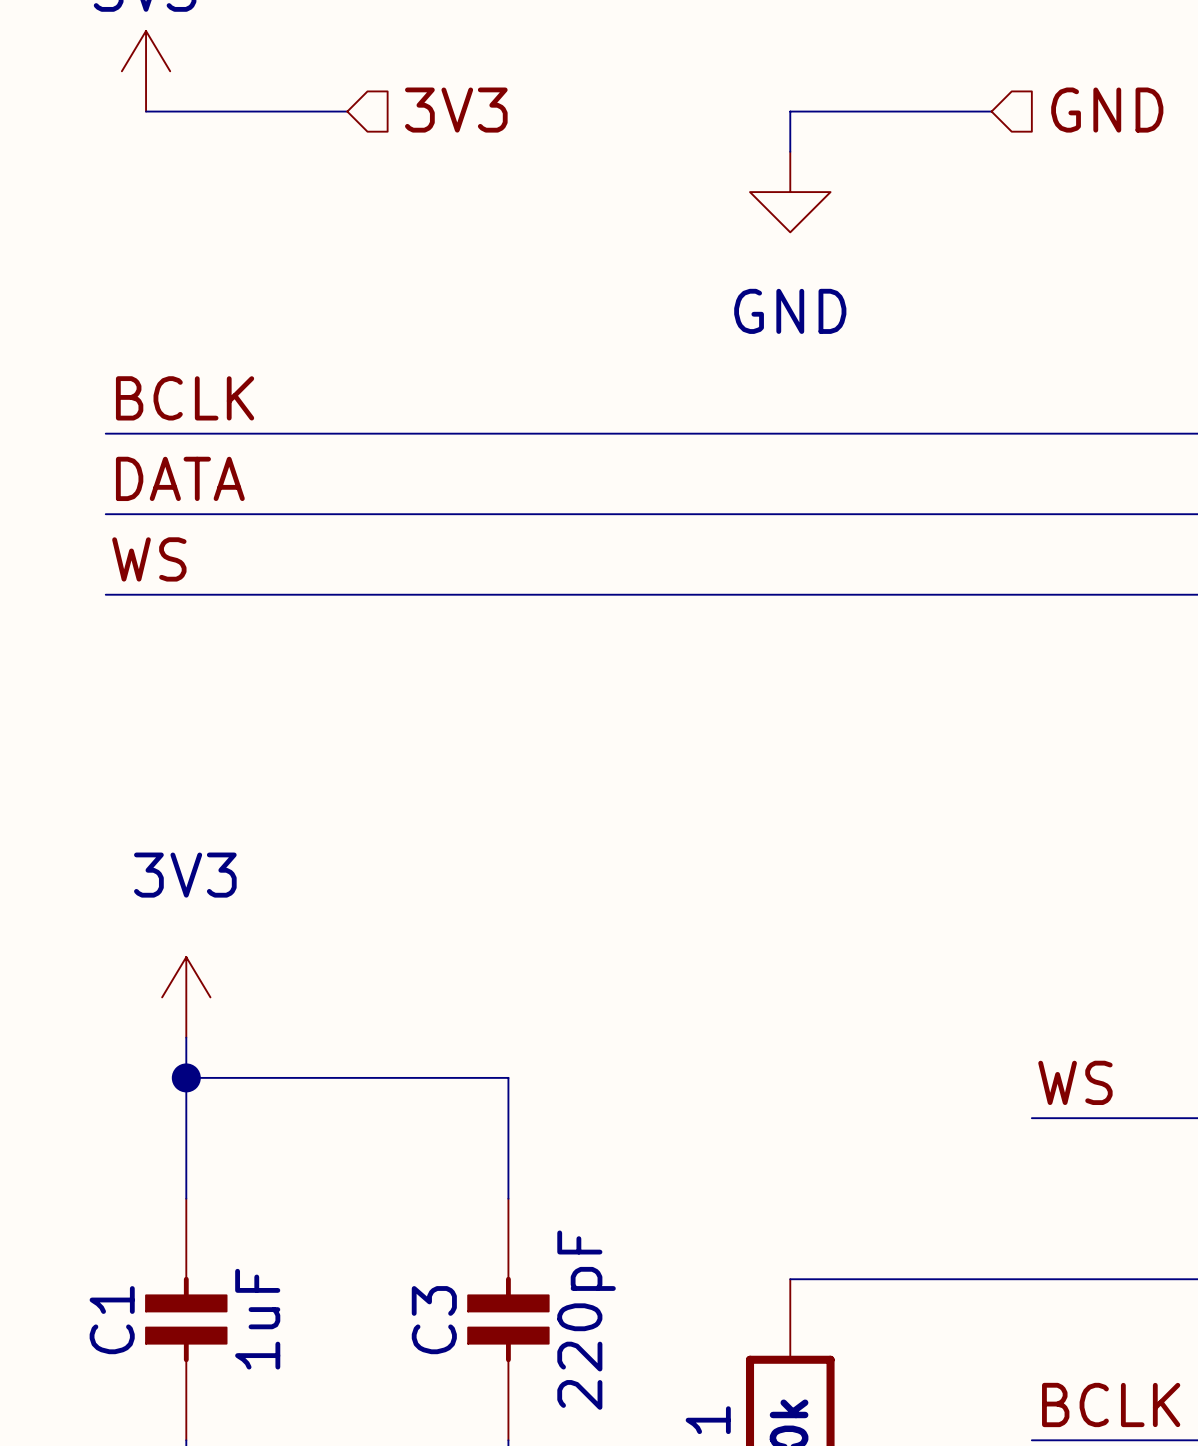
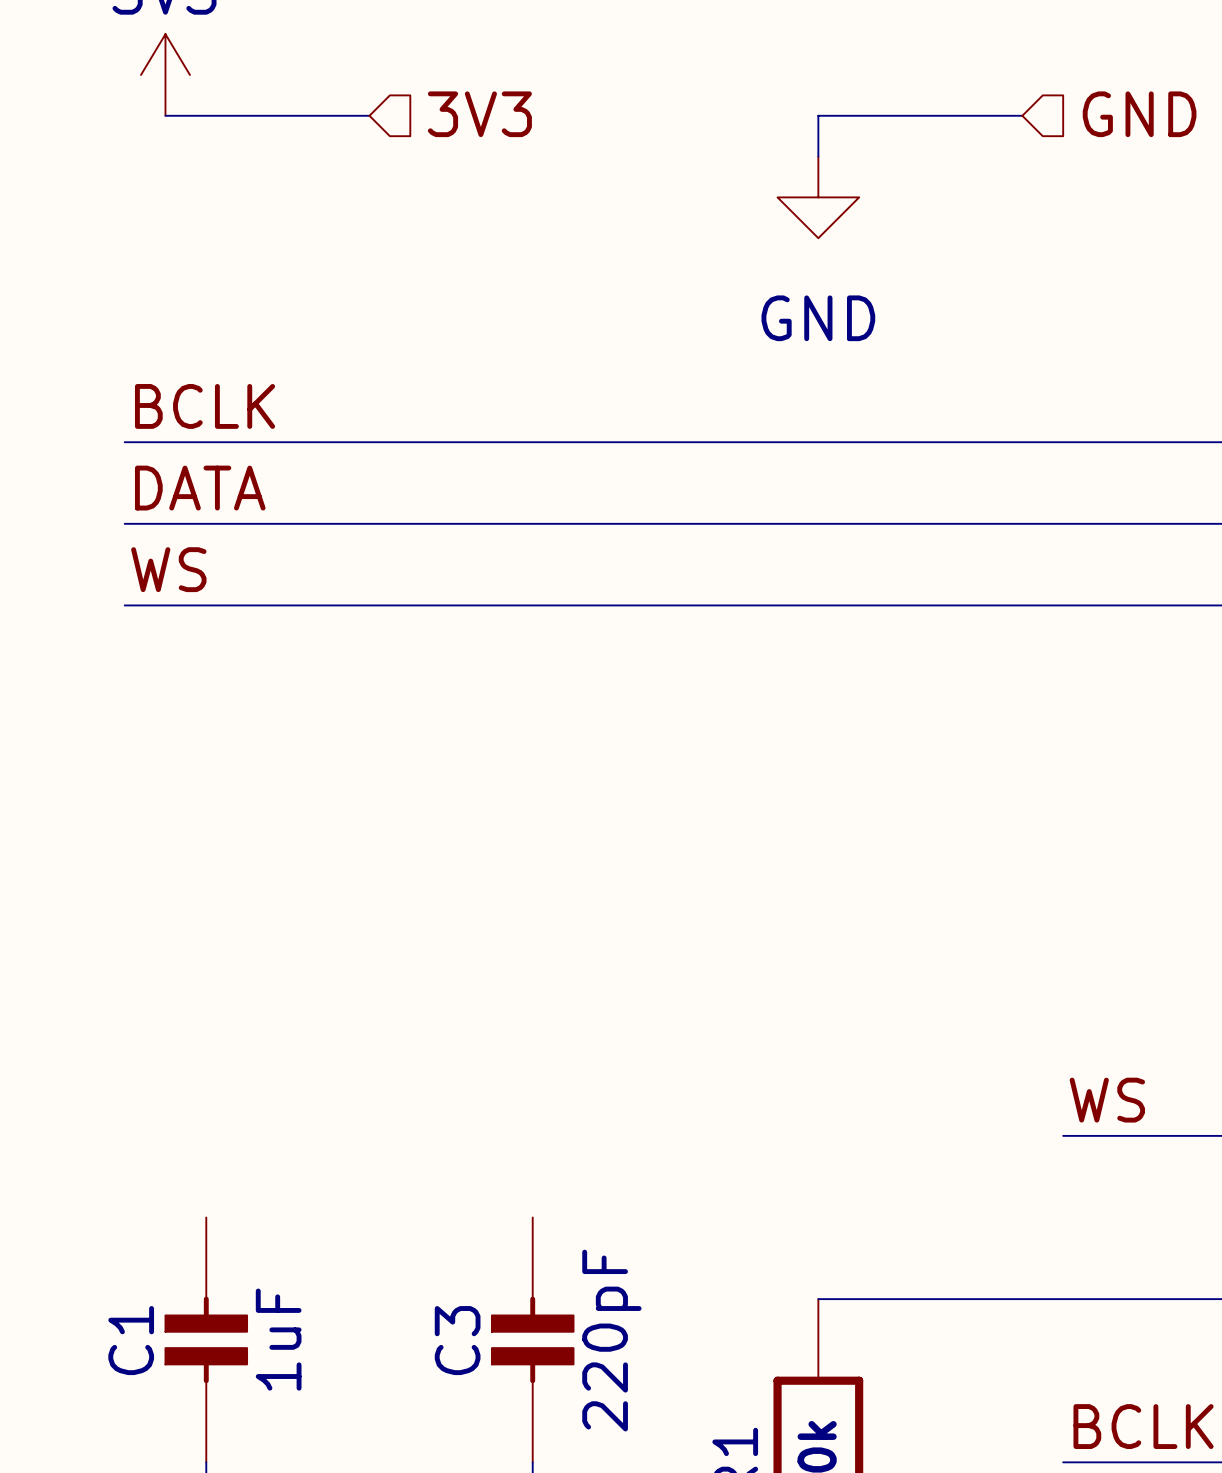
power symbol: 3V3 (186, 997) -> none
wire: (186, 1037) (186, 1198) -> none
wire: (186, 1077) (508, 1077) (508, 1198) -> none
junction: (186, 1077) -> none

